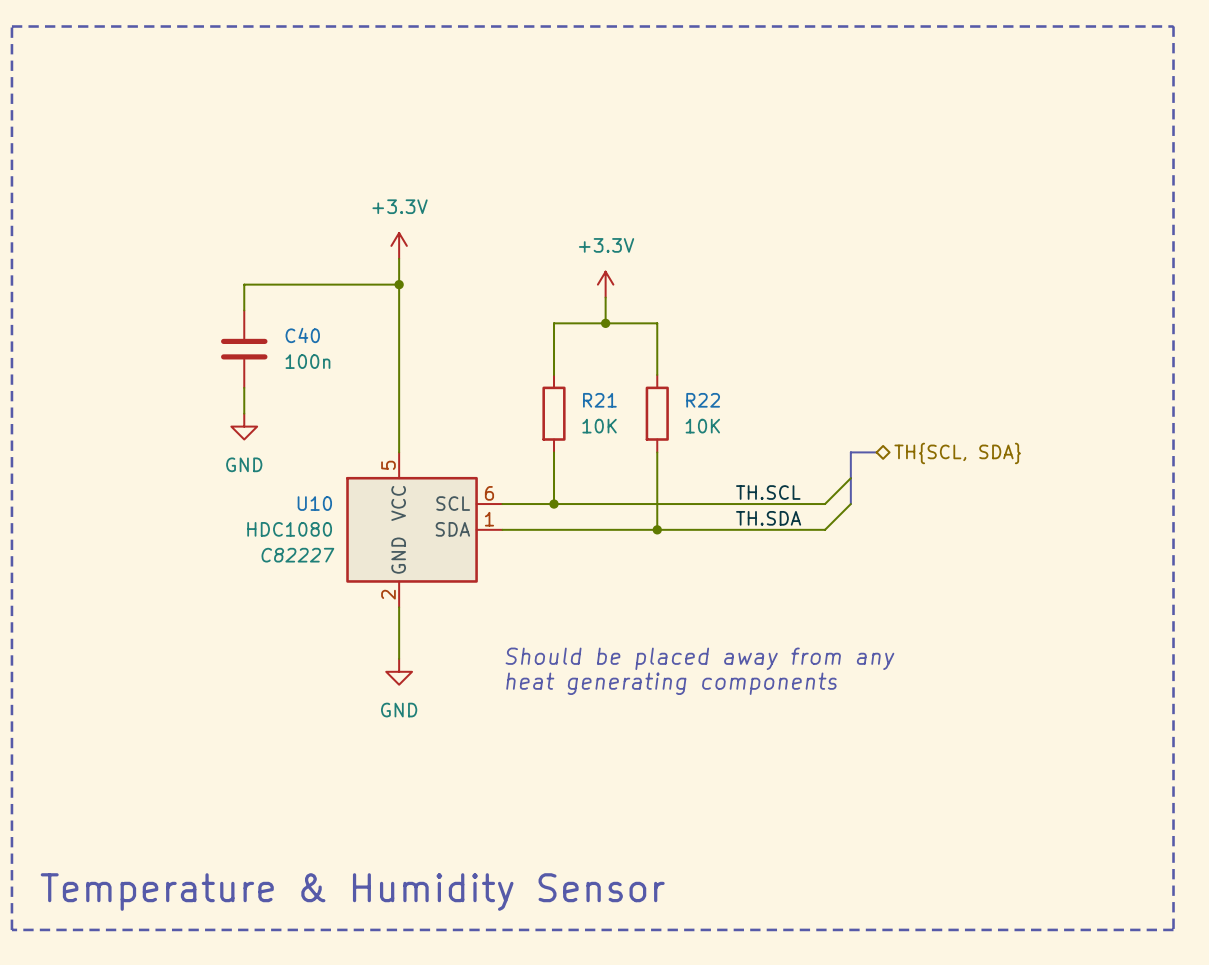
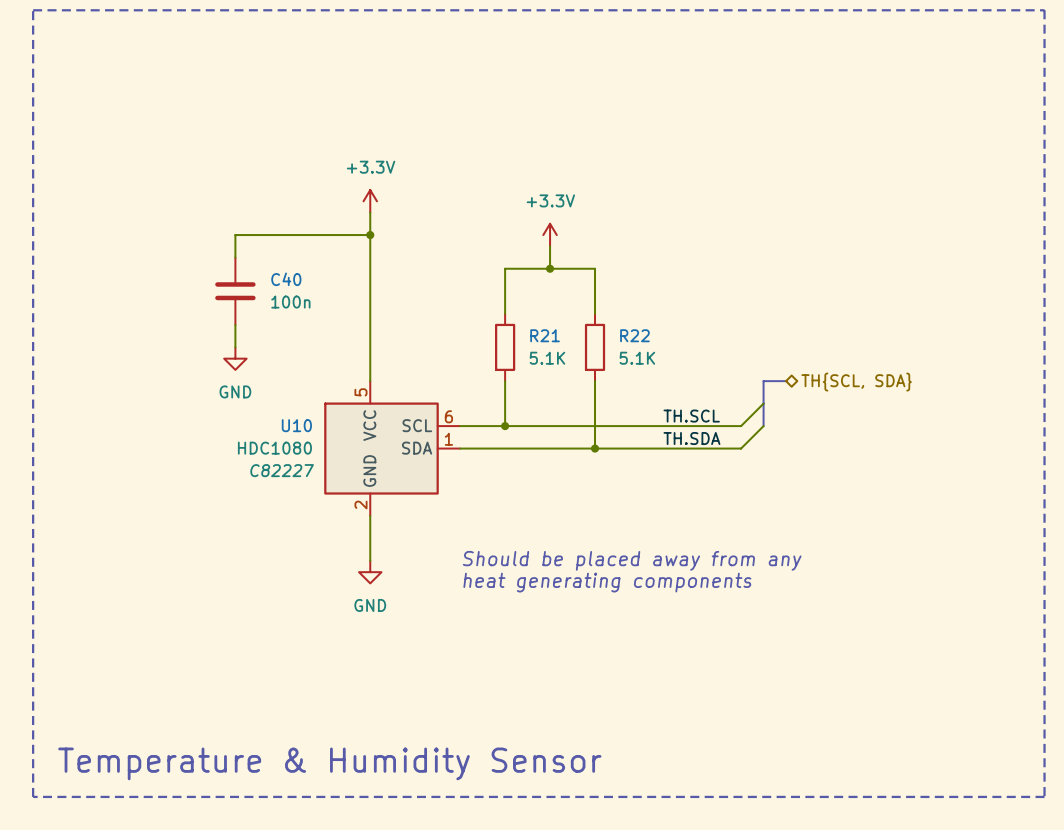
R21 value: 10K (599, 426) -> 5.1K (547, 358)
R22 value: 10K (702, 426) -> 5.1K (637, 358)

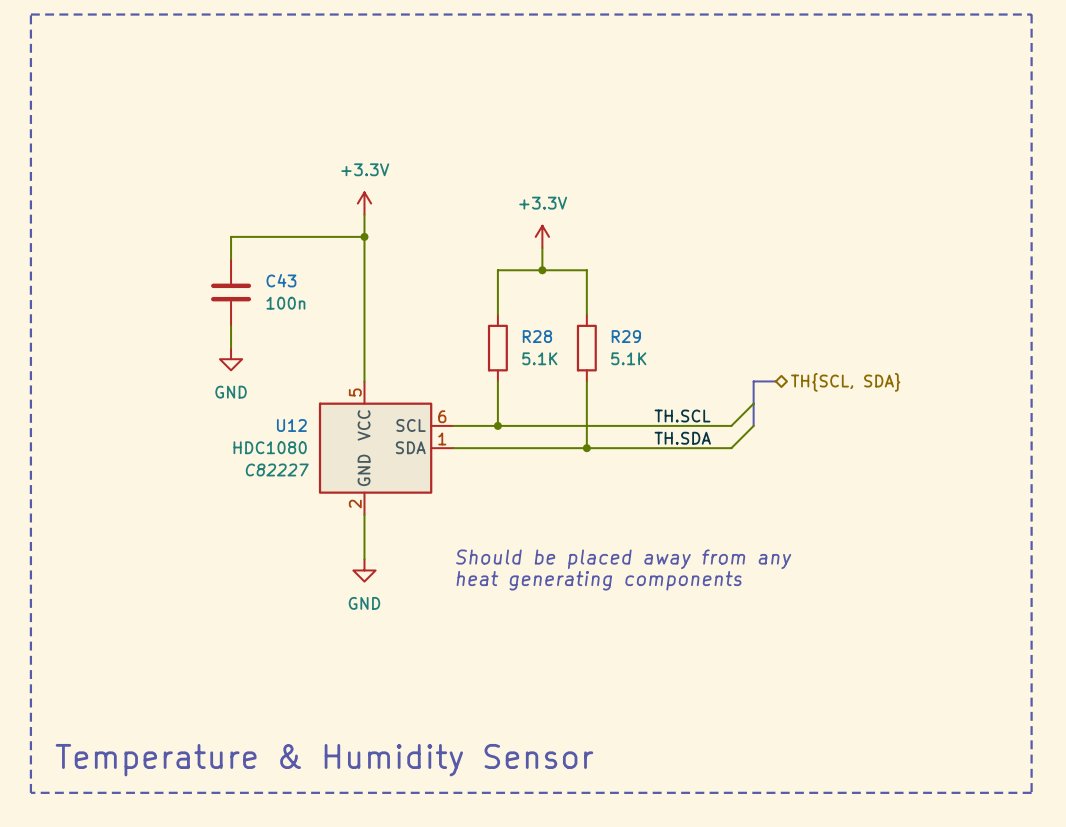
C40 name: C40 (286, 279) -> C43 (281, 280)
R21 name: R21 (545, 335) -> R28 (537, 336)
R22 name: R22 (634, 335) -> R29 (626, 336)
U10 name: U10 (296, 425) -> U12 (291, 425)

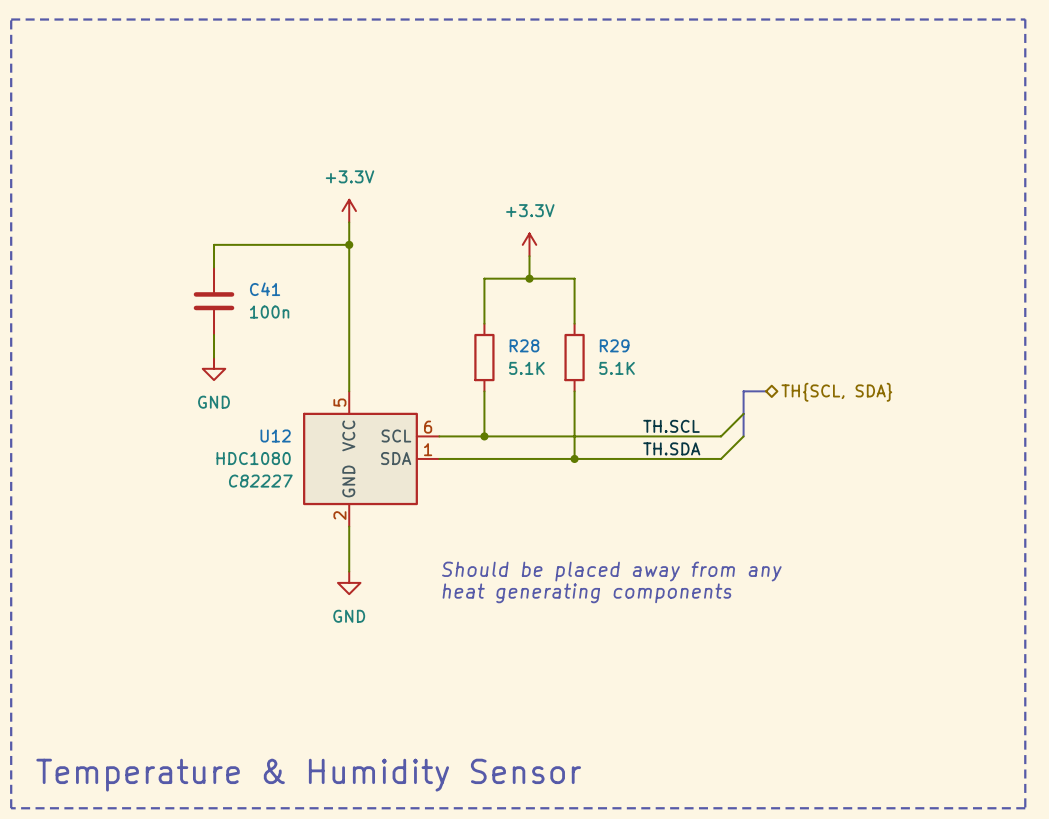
C43 name: C43 (281, 280) -> C41 (265, 289)

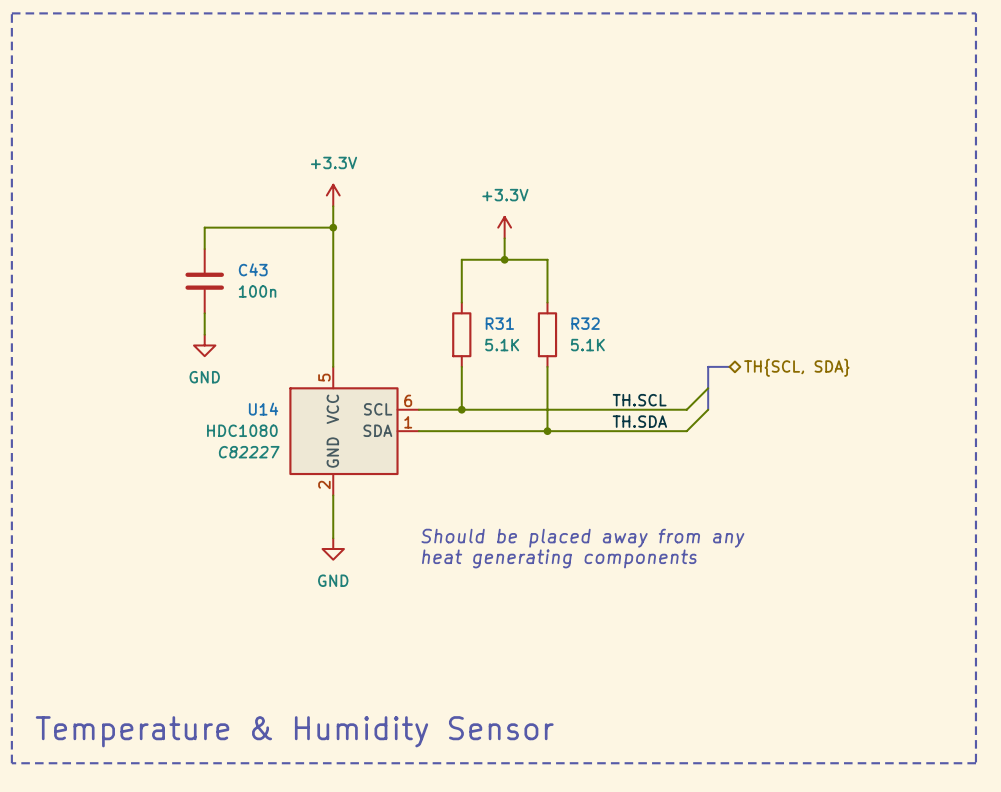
C41 name: C41 (265, 289) -> C43 (253, 269)
R28 name: R28 (524, 345) -> R31 (499, 323)
R29 name: R29 (614, 345) -> R32 (585, 323)
U12 name: U12 (275, 436) -> U14 (263, 409)

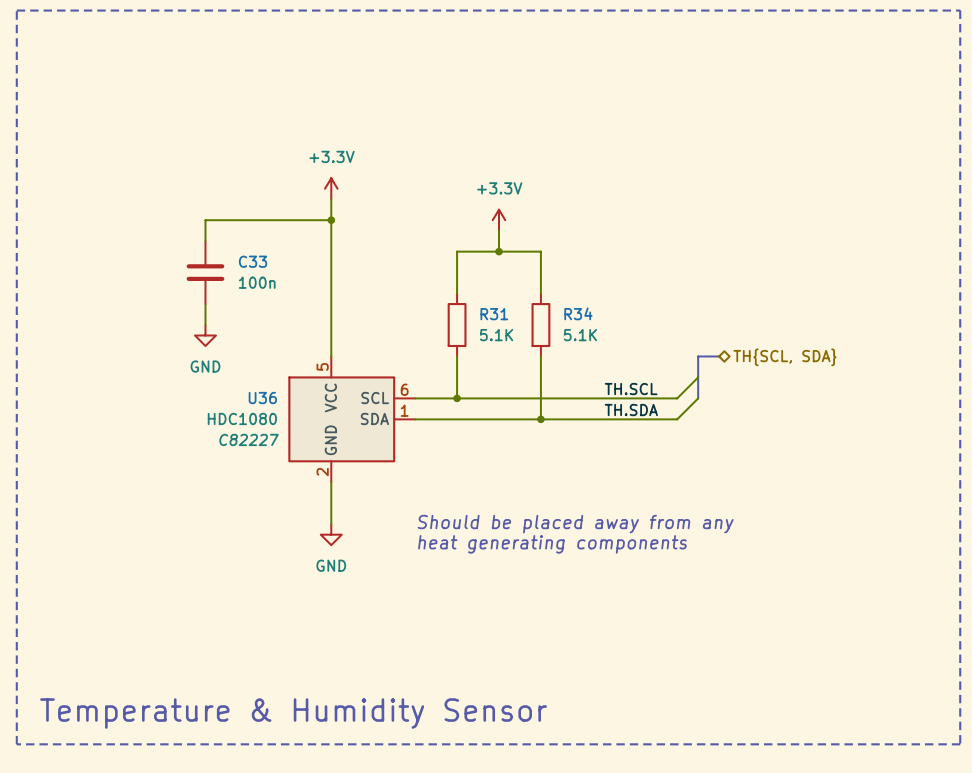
C43 name: C43 (253, 269) -> C33 (252, 261)
R32 name: R32 (585, 323) -> R34 (578, 313)
U14 name: U14 (263, 409) -> U36 (262, 398)

